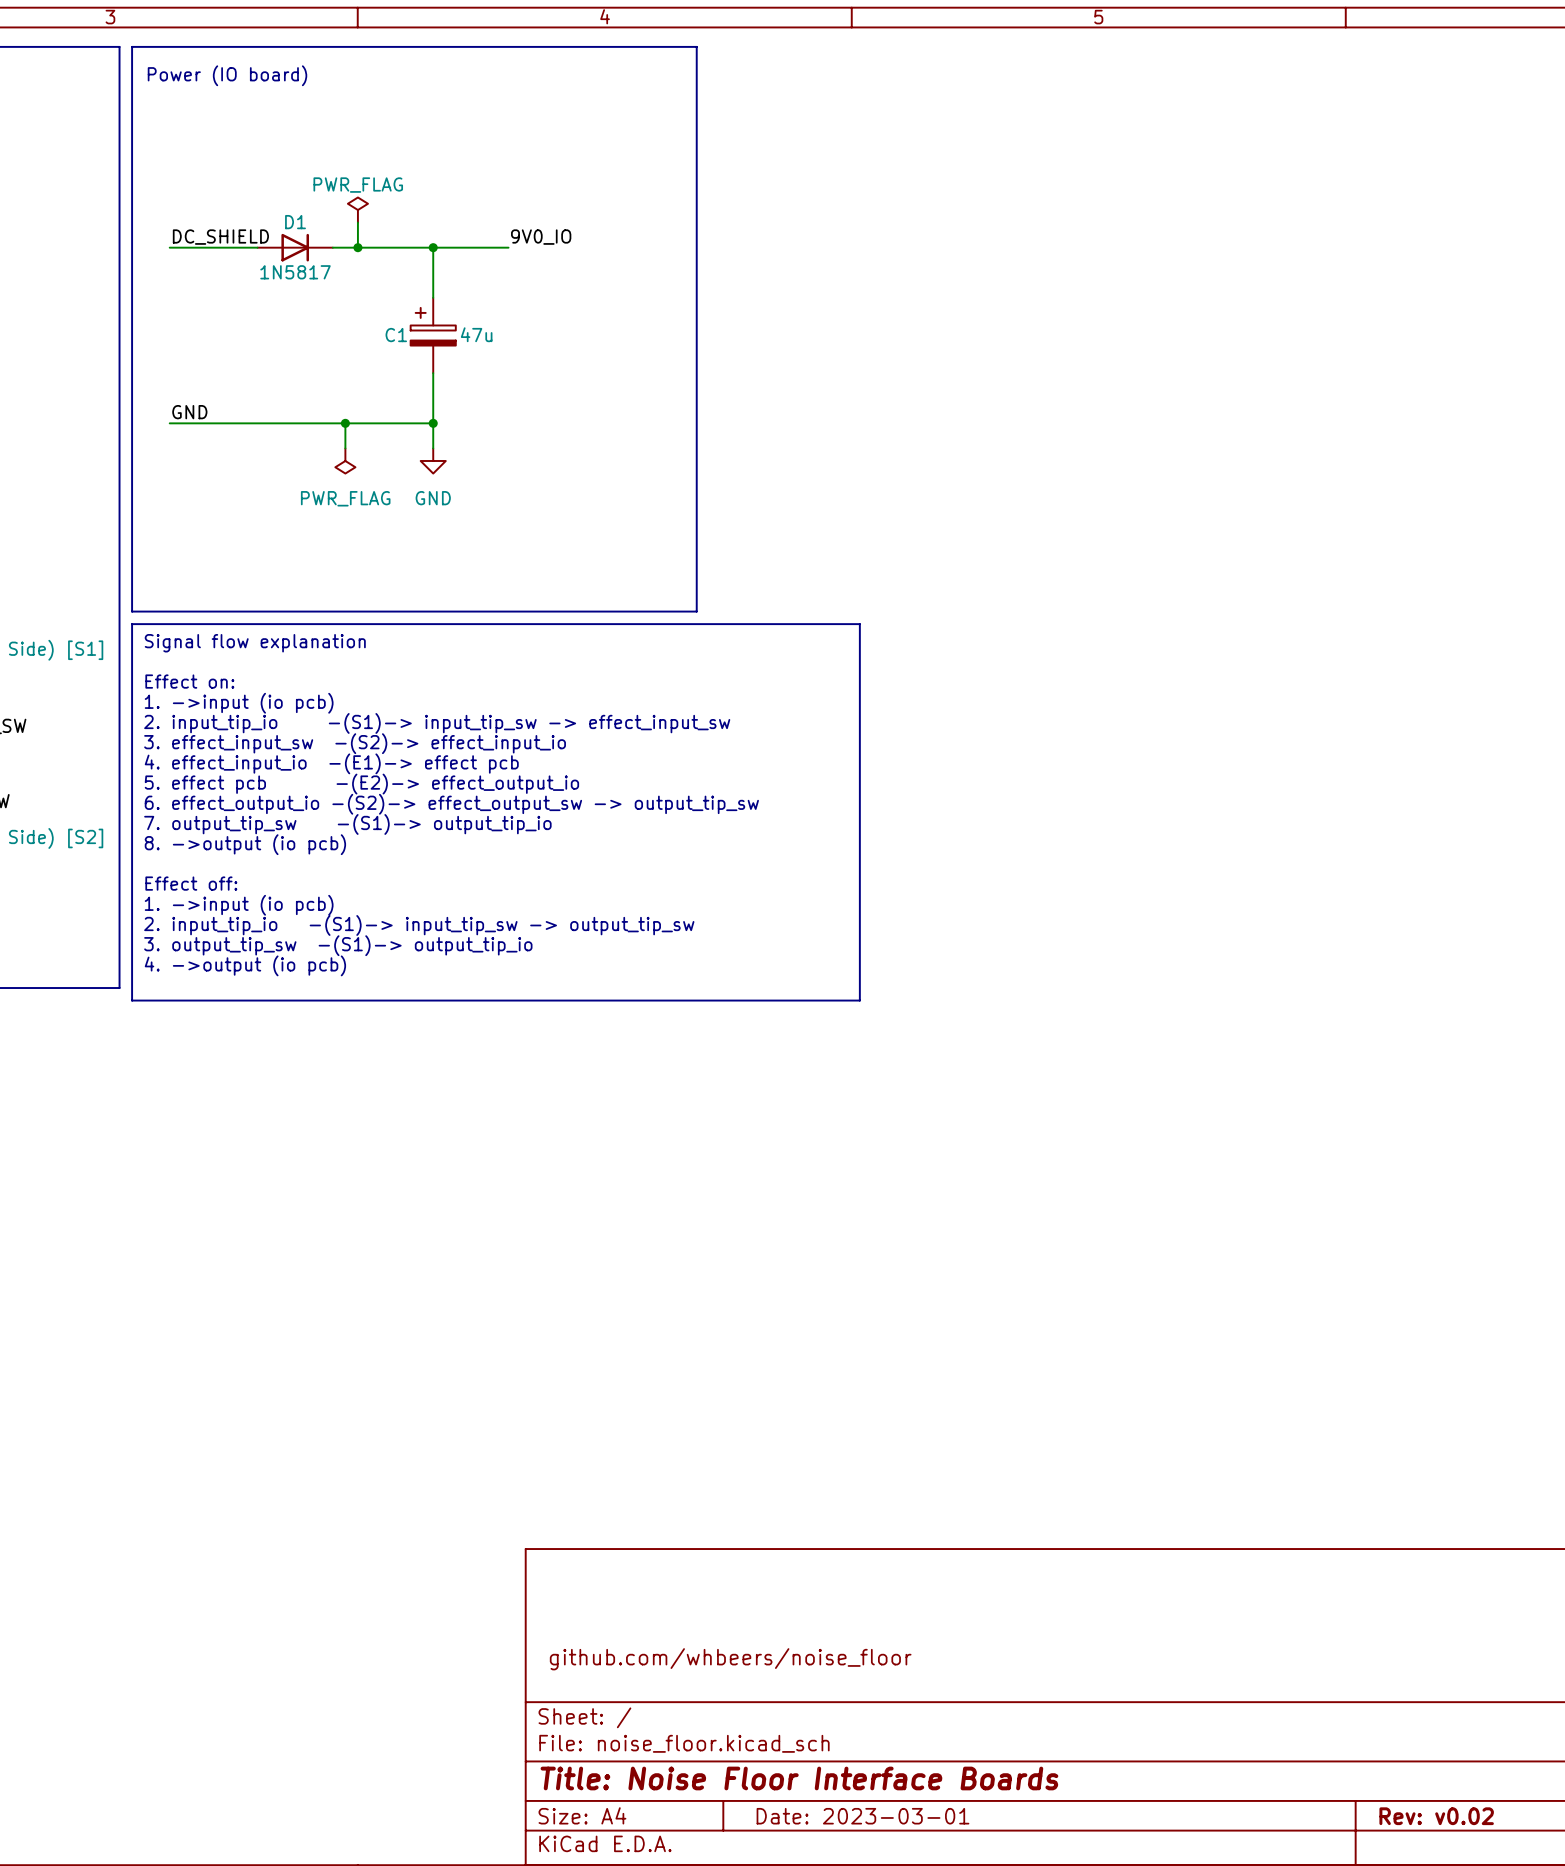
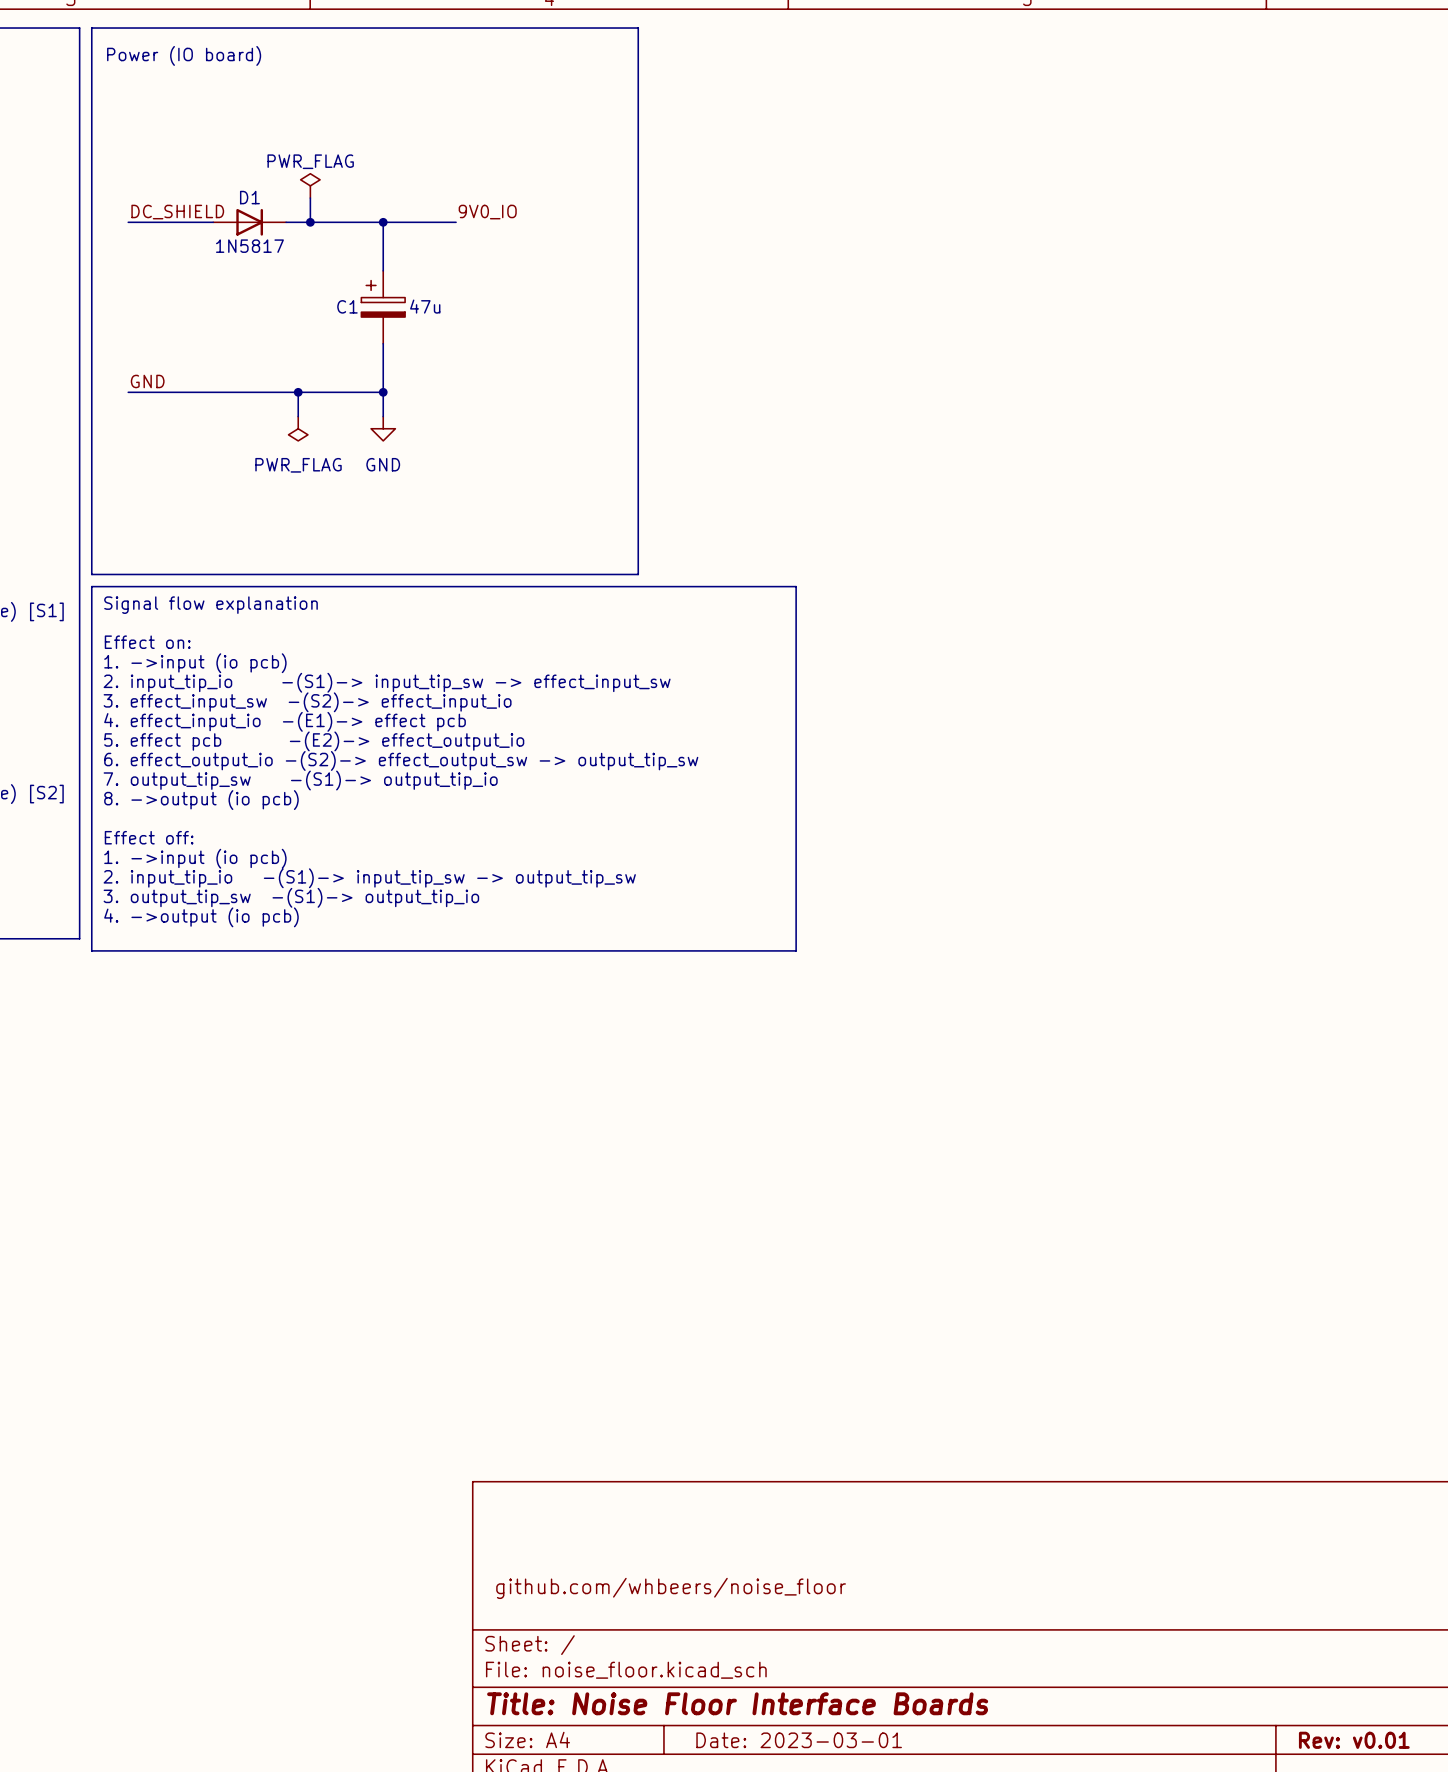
title block: Rev: v0.02 (1436, 1816) -> Rev: v0.01 (1354, 1740)

